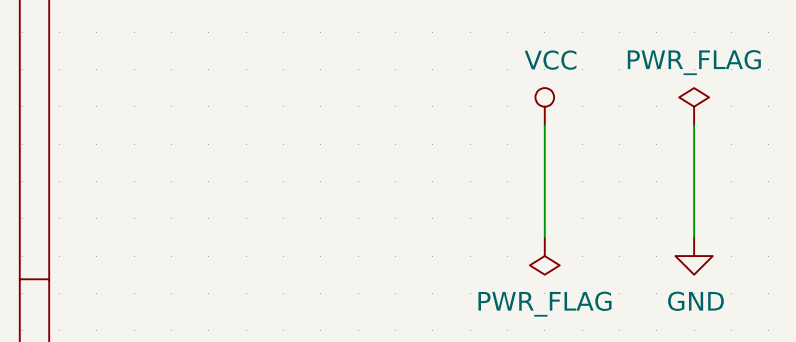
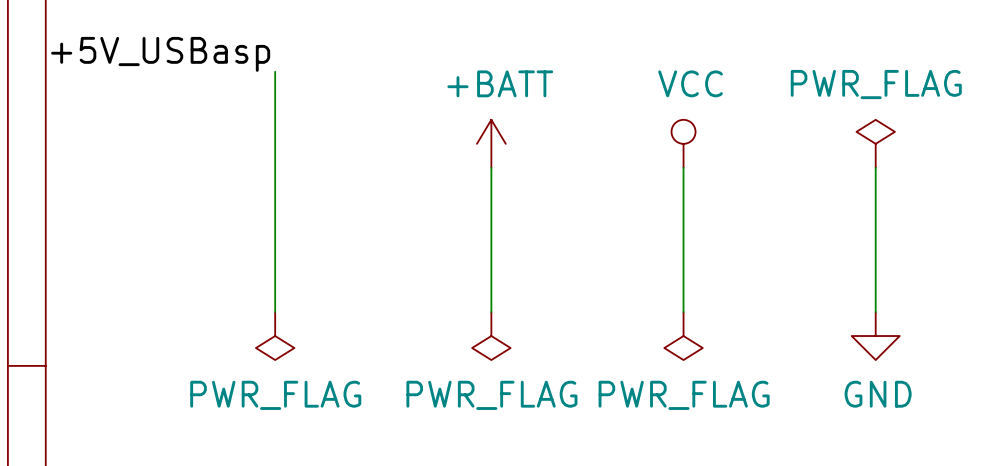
label: none -> +5V_USBasp (160, 54)
wire: none -> (275, 71) (275, 312)
power symbol: none -> +BATT (491, 143)
wire: none -> (491, 167) (491, 312)
power symbol: none -> PWR_FLAG (275, 336)
power symbol: none -> PWR_FLAG (491, 336)

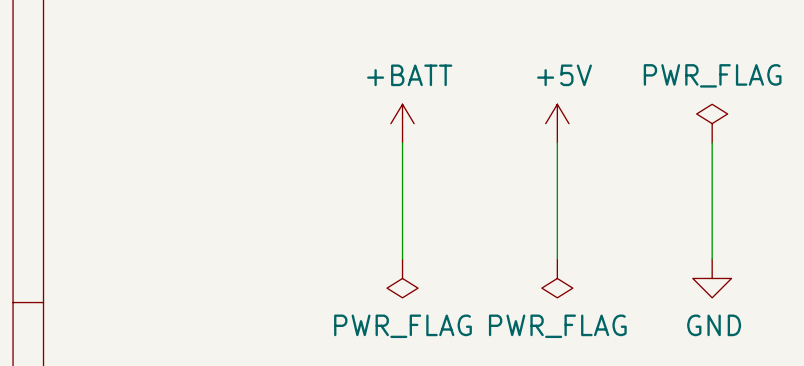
label: +5V_USBasp (160, 54) -> none
wire: (275, 71) (275, 312) -> none
power symbol: VCC (683, 143) -> +5V (557, 123)
power symbol: PWR_FLAG (275, 336) -> none

